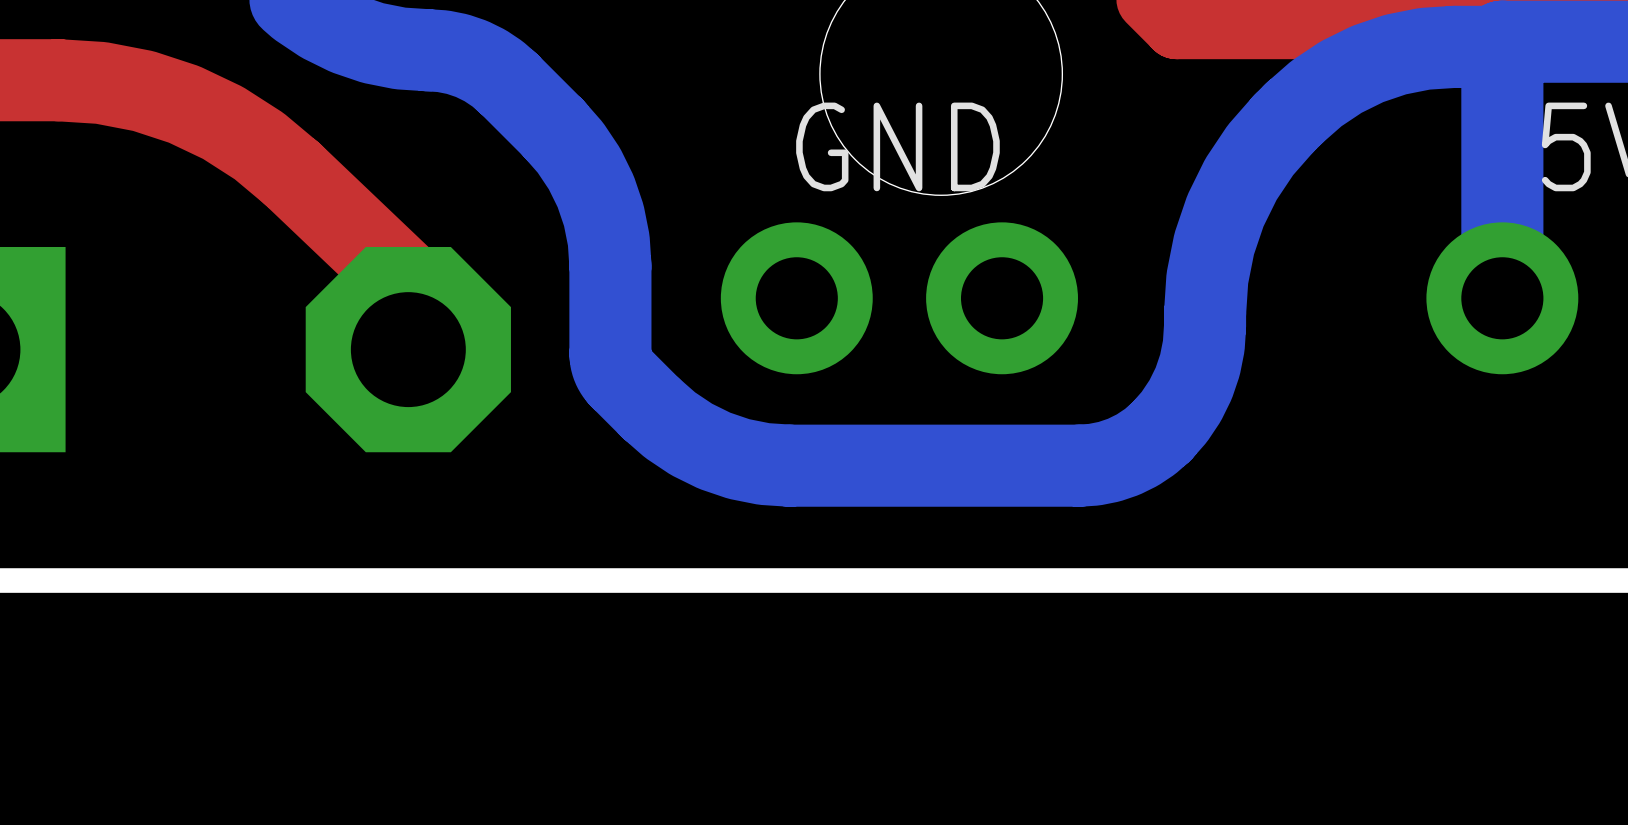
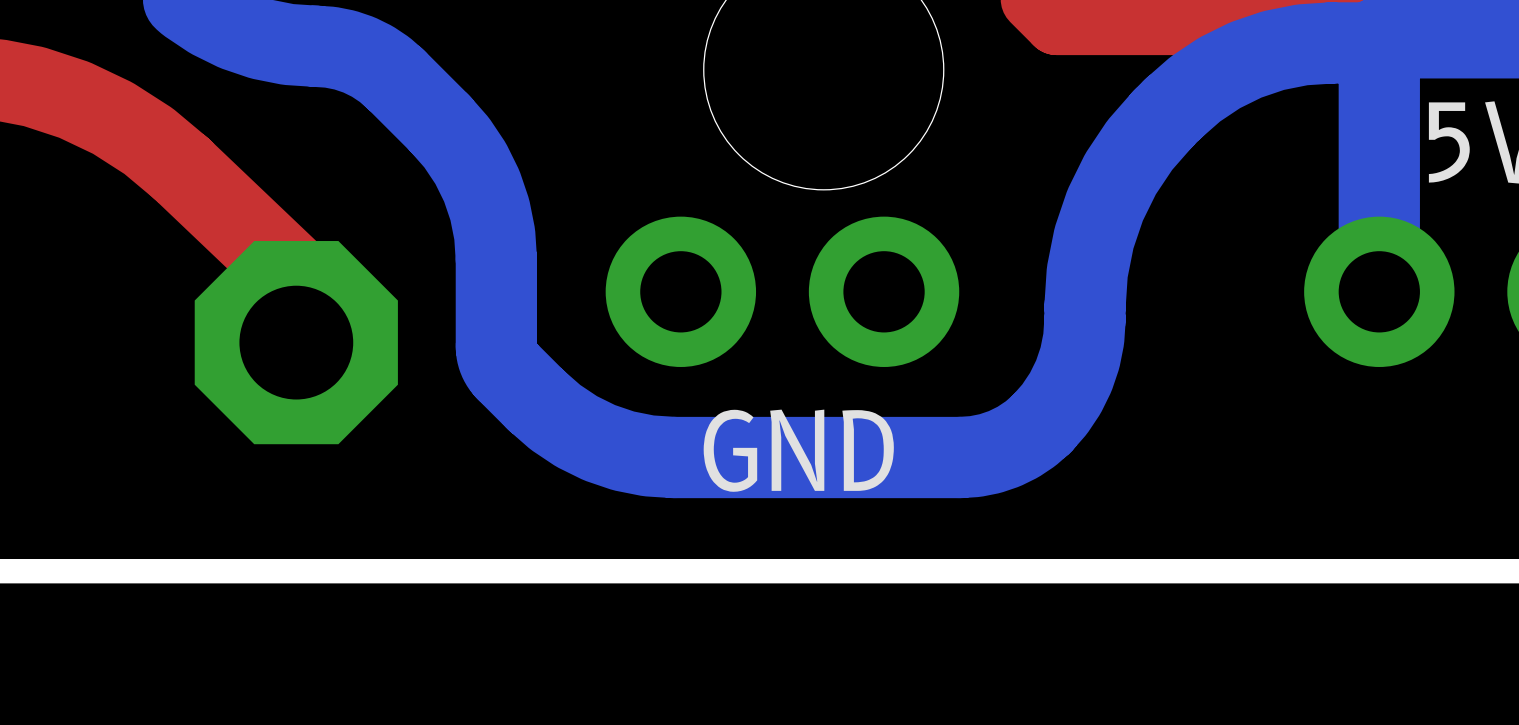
text position: GND (897, 146) -> GND (798, 450)

